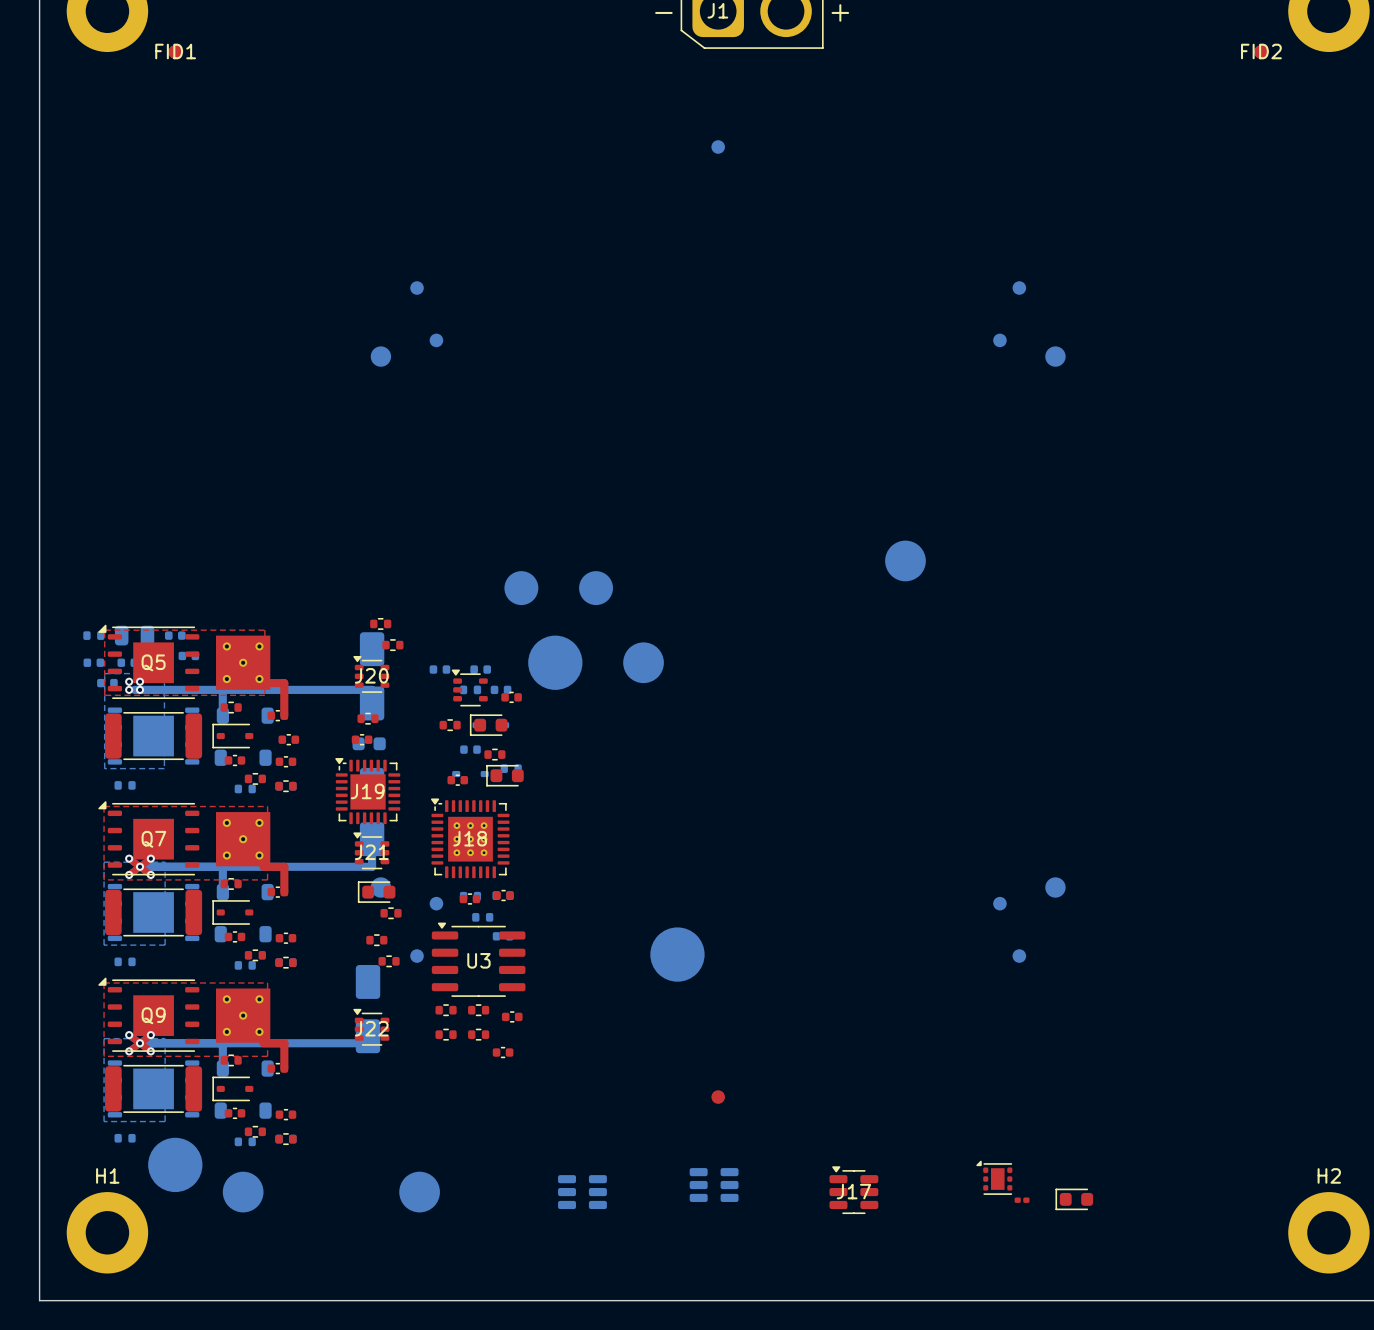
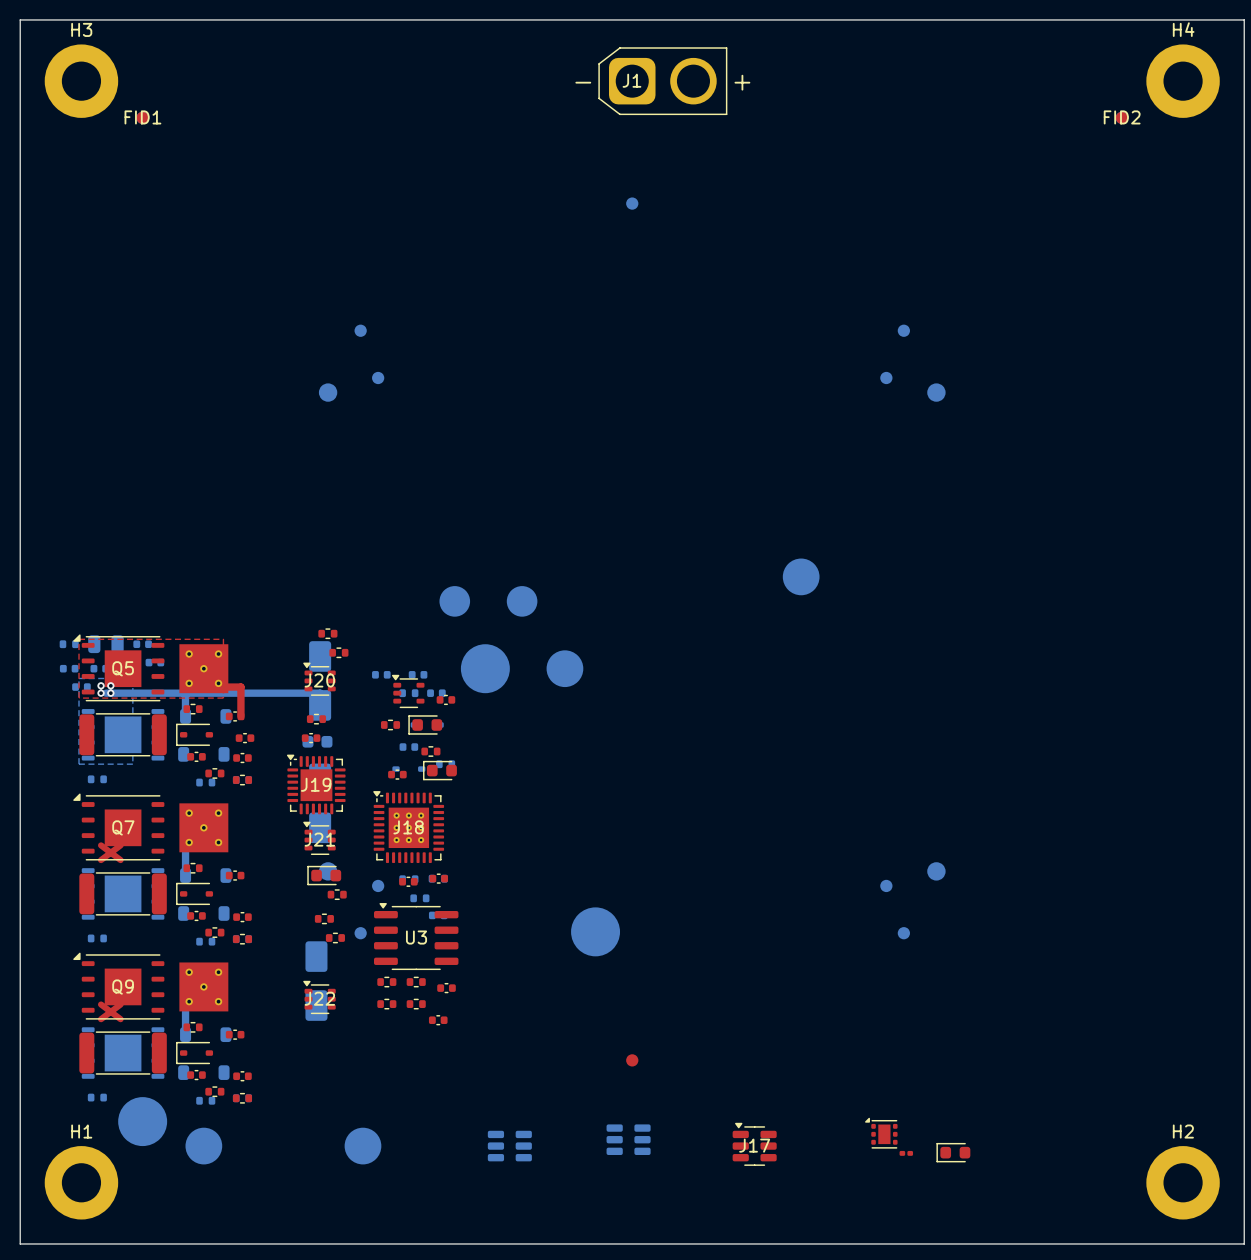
top zone outline: (104, 806) (104, 879) (267, 879) (267, 806) (104, 806) -> none
bottom track: (372, 839) (372, 866) (140, 866) -> none
via: (129, 858) -> none
via: (150, 858) -> none
bottom zone outline: (104, 862) (165, 862) (165, 945) (104, 945) (104, 862) -> none
via: (140, 866) -> none
top track: (263, 866) (284, 866) (284, 892) -> none
via: (129, 874) -> none
via: (150, 874) -> none
top zone outline: (104, 982) (267, 982) (267, 1056) (104, 1056) (104, 982) -> none
via: (129, 1035) -> none
via: (150, 1035) -> none
bottom track: (368, 1036) (368, 1043) (140, 1043) -> none
bottom zone outline: (104, 1038) (104, 1121) (165, 1121) (165, 1038) (104, 1038) -> none
via: (140, 1043) -> none
top track: (263, 1043) (284, 1043) (284, 1068) -> none
via: (129, 1051) -> none
via: (150, 1051) -> none

